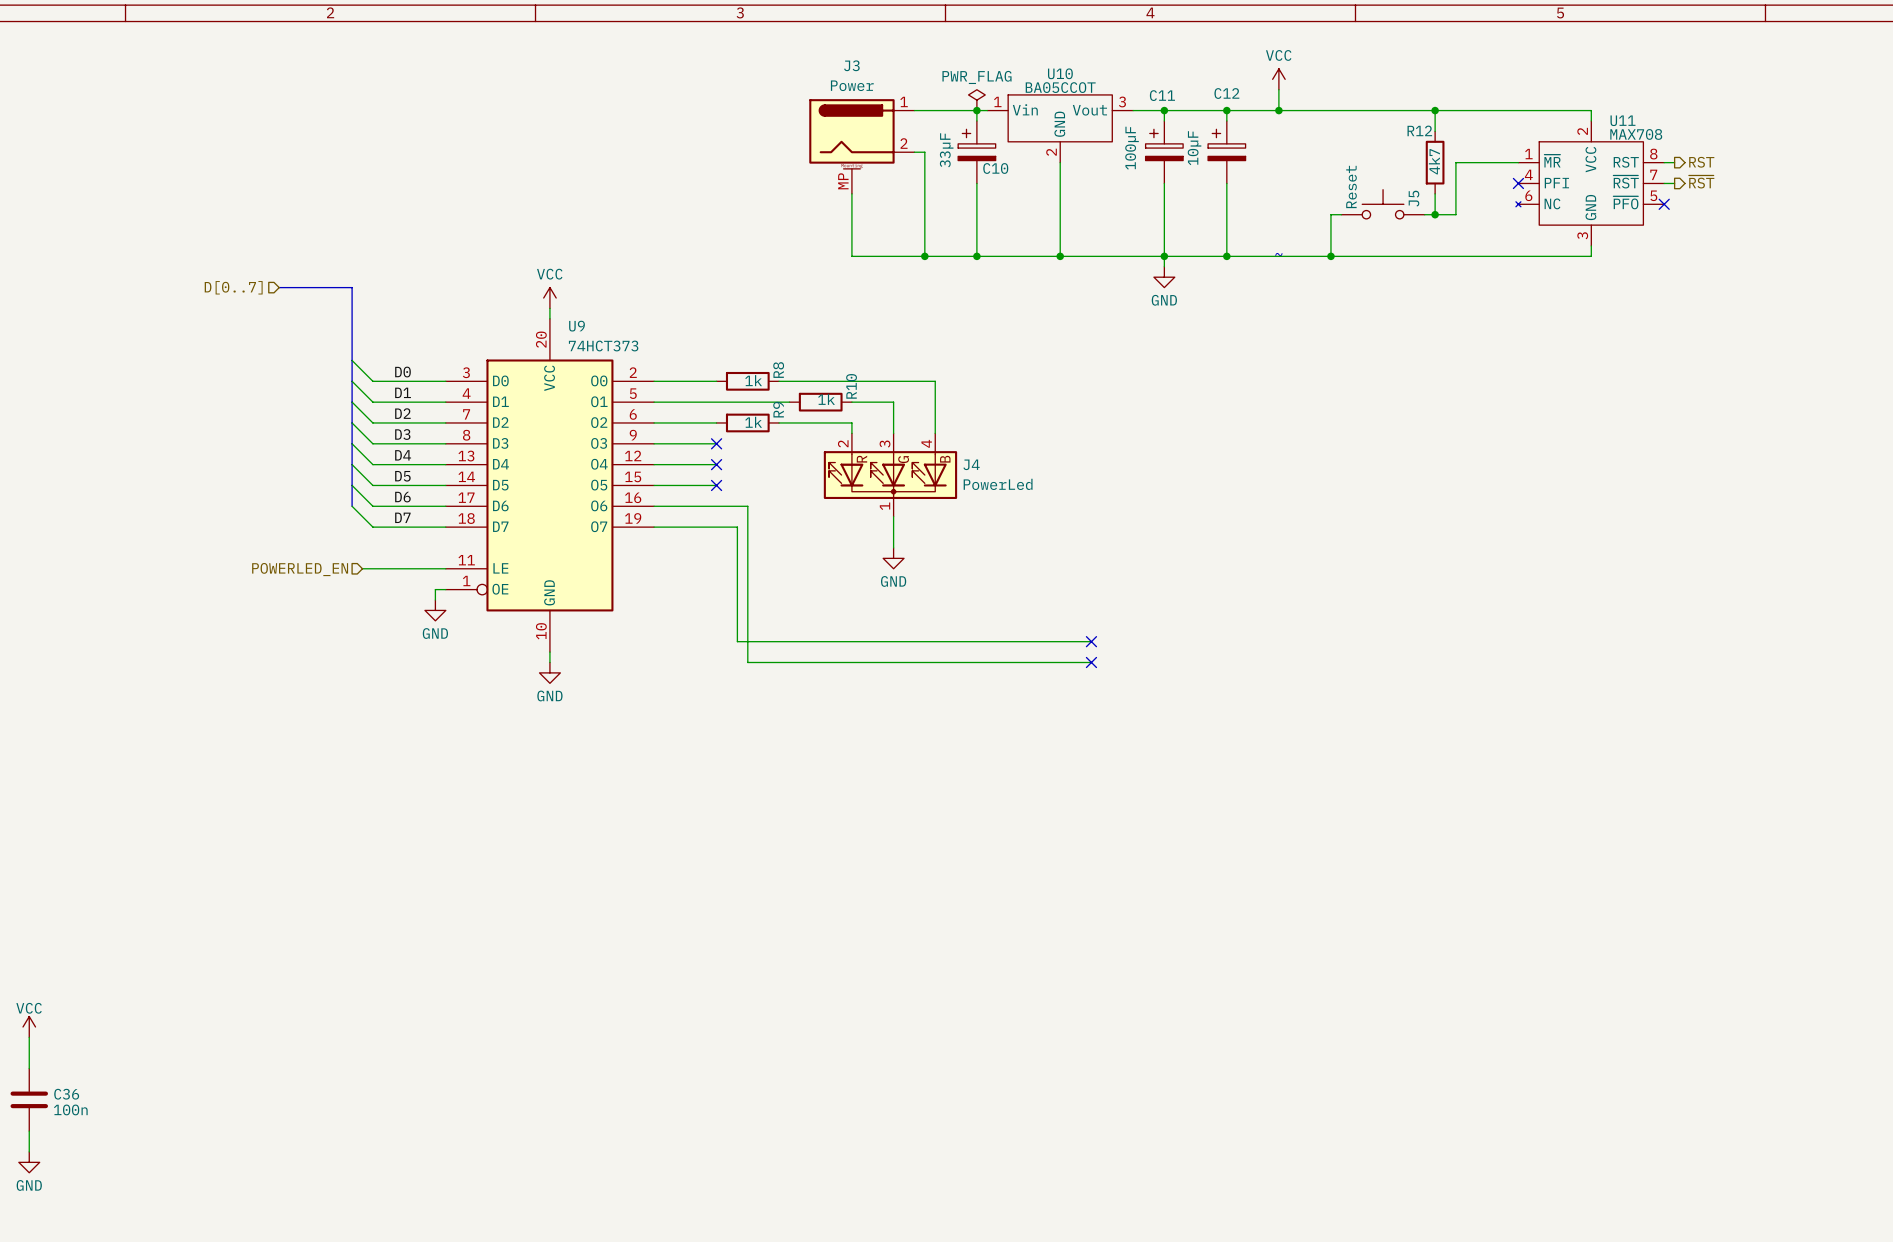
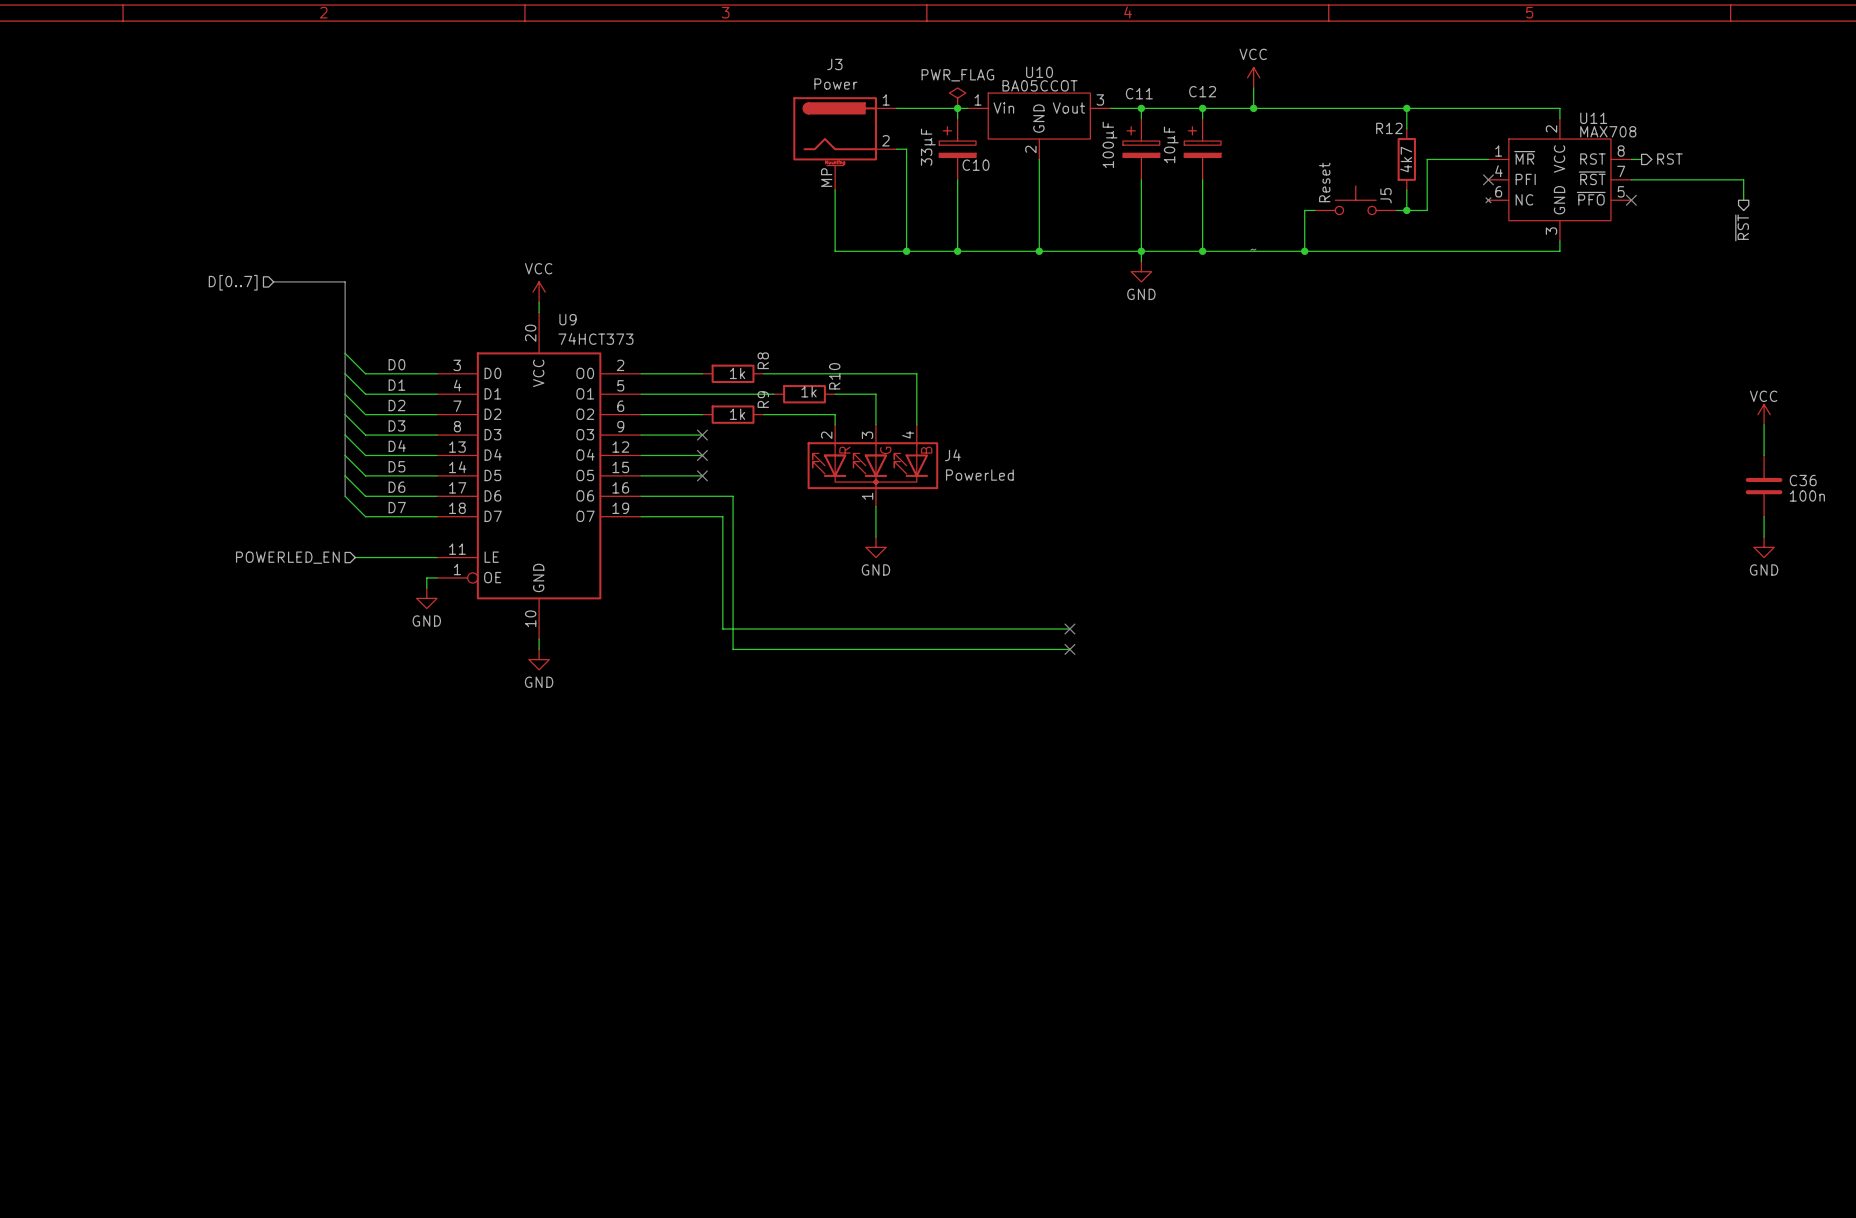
hierarchical label rotation: 0° (1701, 181) -> 90° clockwise (1742, 227)
hierarchical label position: ~{RST} (1701, 181) -> ~{RST} (1742, 227)
wire: none -> (1641, 179) (1743, 179) (1743, 200)
power symbol: none -> VCC (1764, 414)
wire: none -> (1764, 424) (1764, 455)
wire: none -> (1764, 516) (1764, 537)
power symbol: none -> GND (1764, 547)
power symbol: VCC (29, 1026) -> none
wire: (29, 1037) (29, 1068) -> none
C36 position: (29, 1099) -> (1764, 486)
wire: (29, 1131) (29, 1151) -> none
power symbol: GND (29, 1162) -> none

